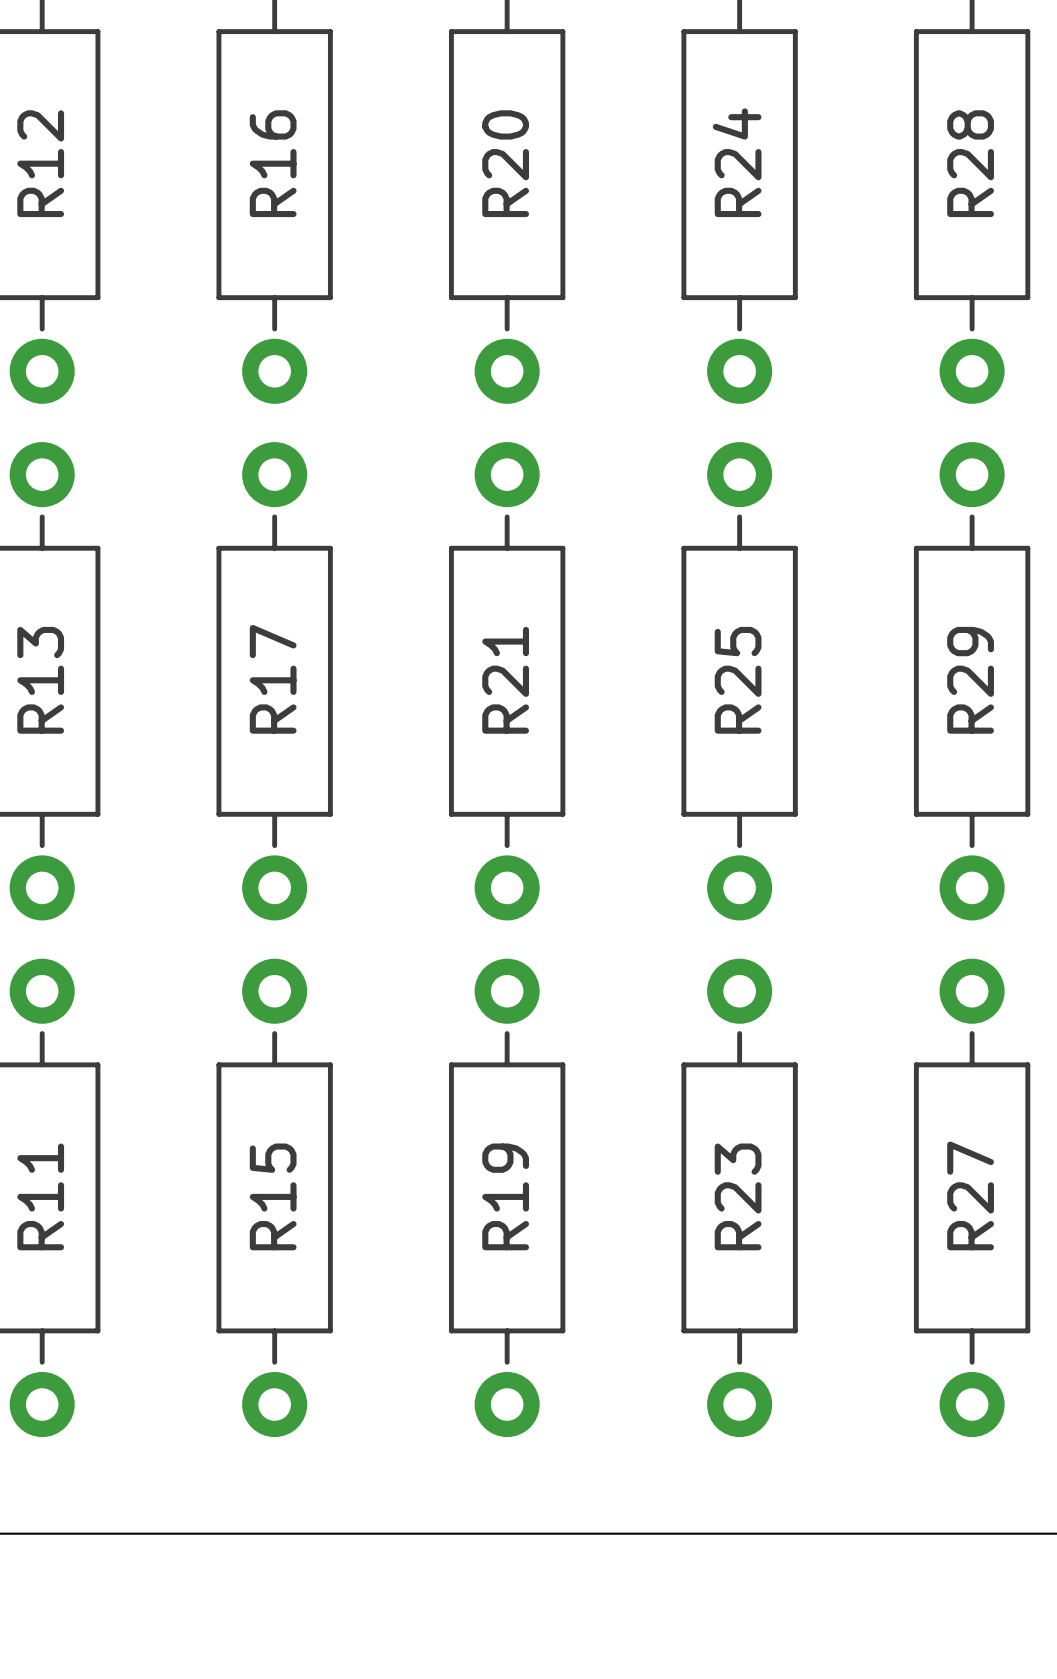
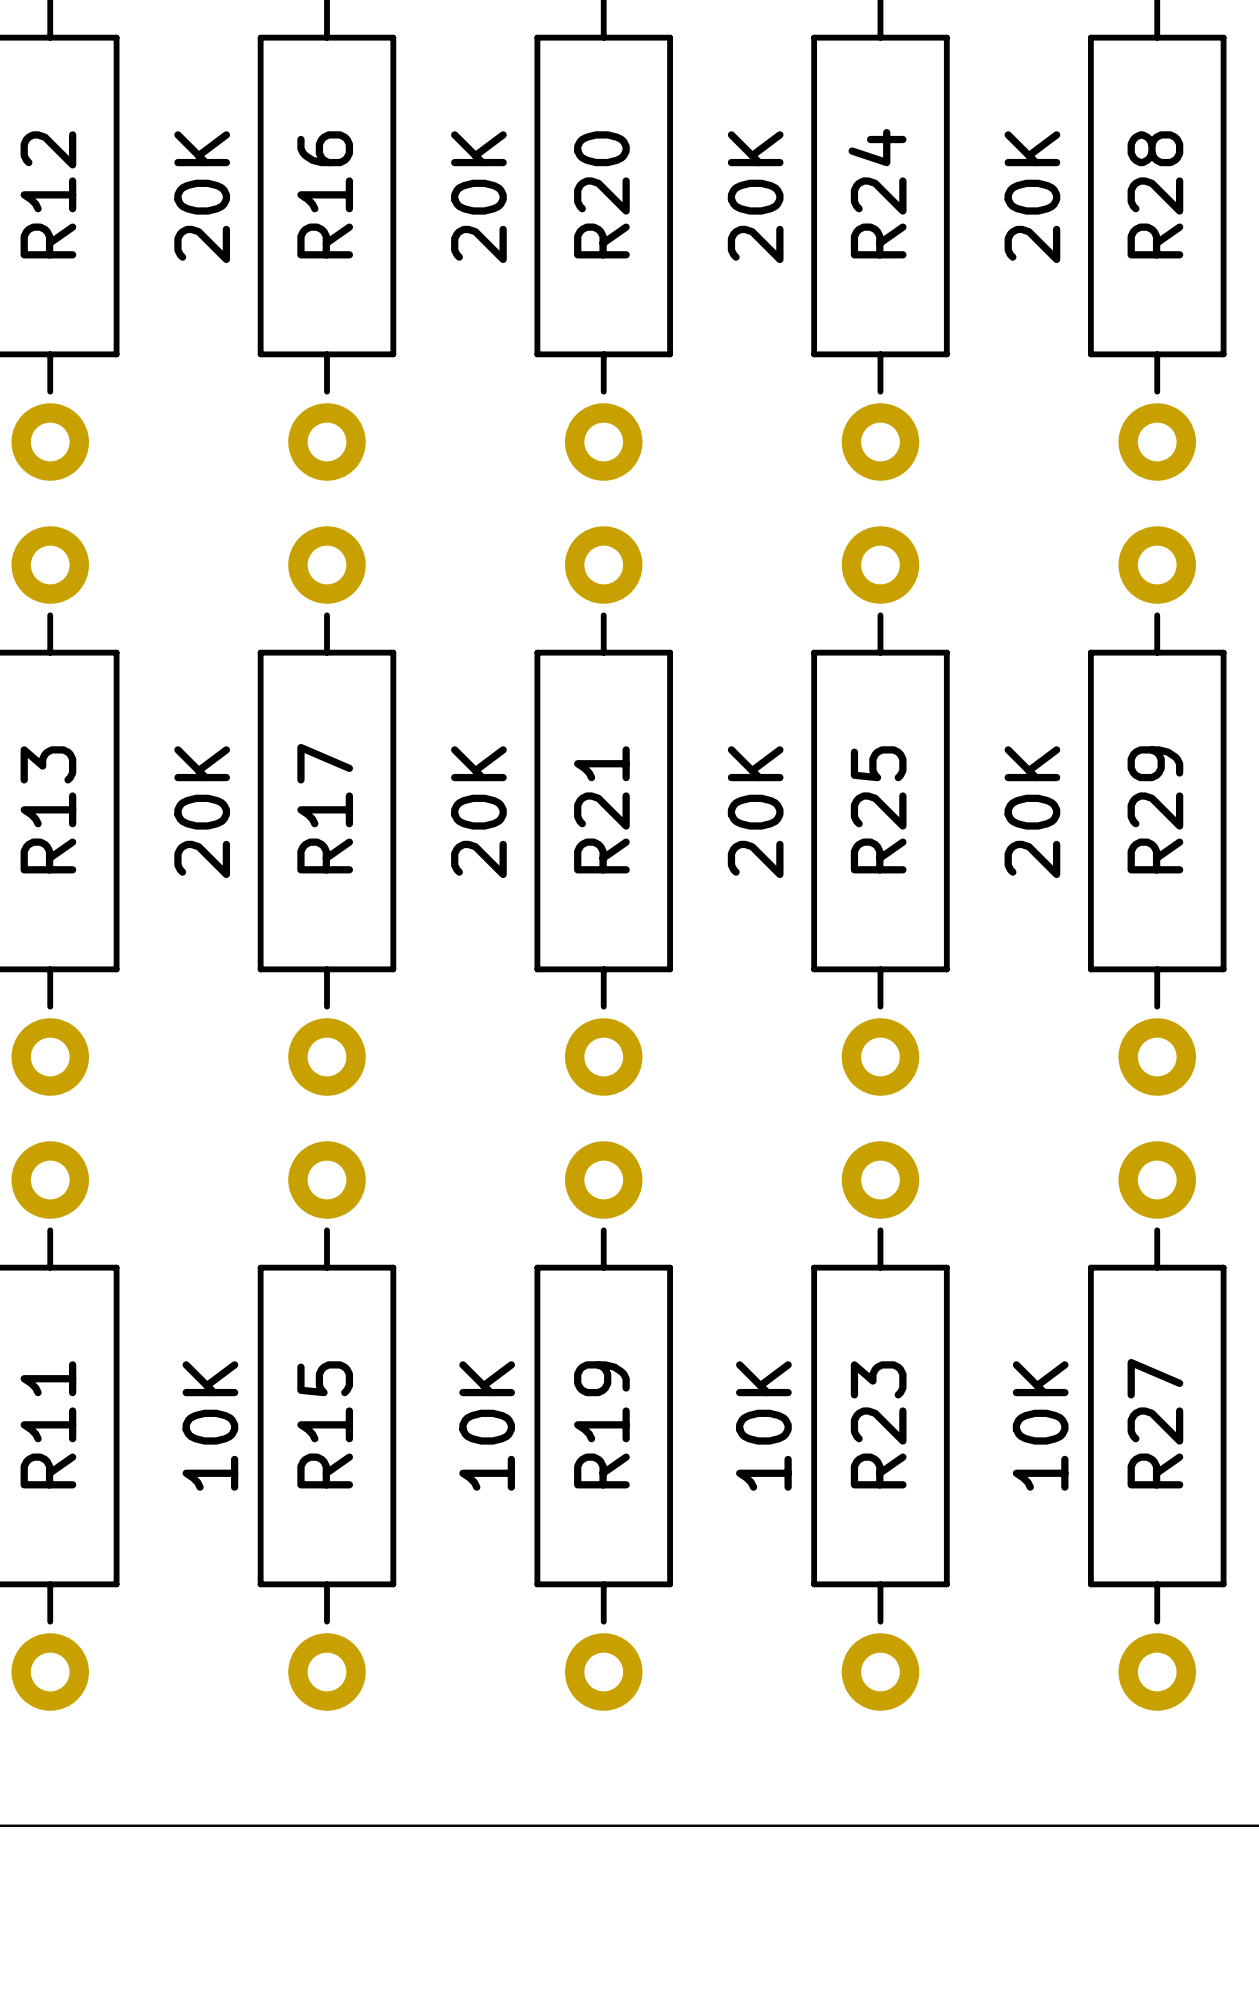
R16 value: none -> 20K (202, 197)
R20 value: none -> 20K (478, 197)
R24 value: none -> 20K (755, 197)
R28 value: none -> 20K (1032, 197)
R17 value: none -> 20K (202, 812)
R21 value: none -> 20K (478, 812)
R25 value: none -> 20K (755, 812)
R29 value: none -> 20K (1032, 812)
R15 value: none -> 10K (210, 1426)
R19 value: none -> 10K (487, 1426)
R23 value: none -> 10K (763, 1426)
R27 value: none -> 10K (1040, 1426)

